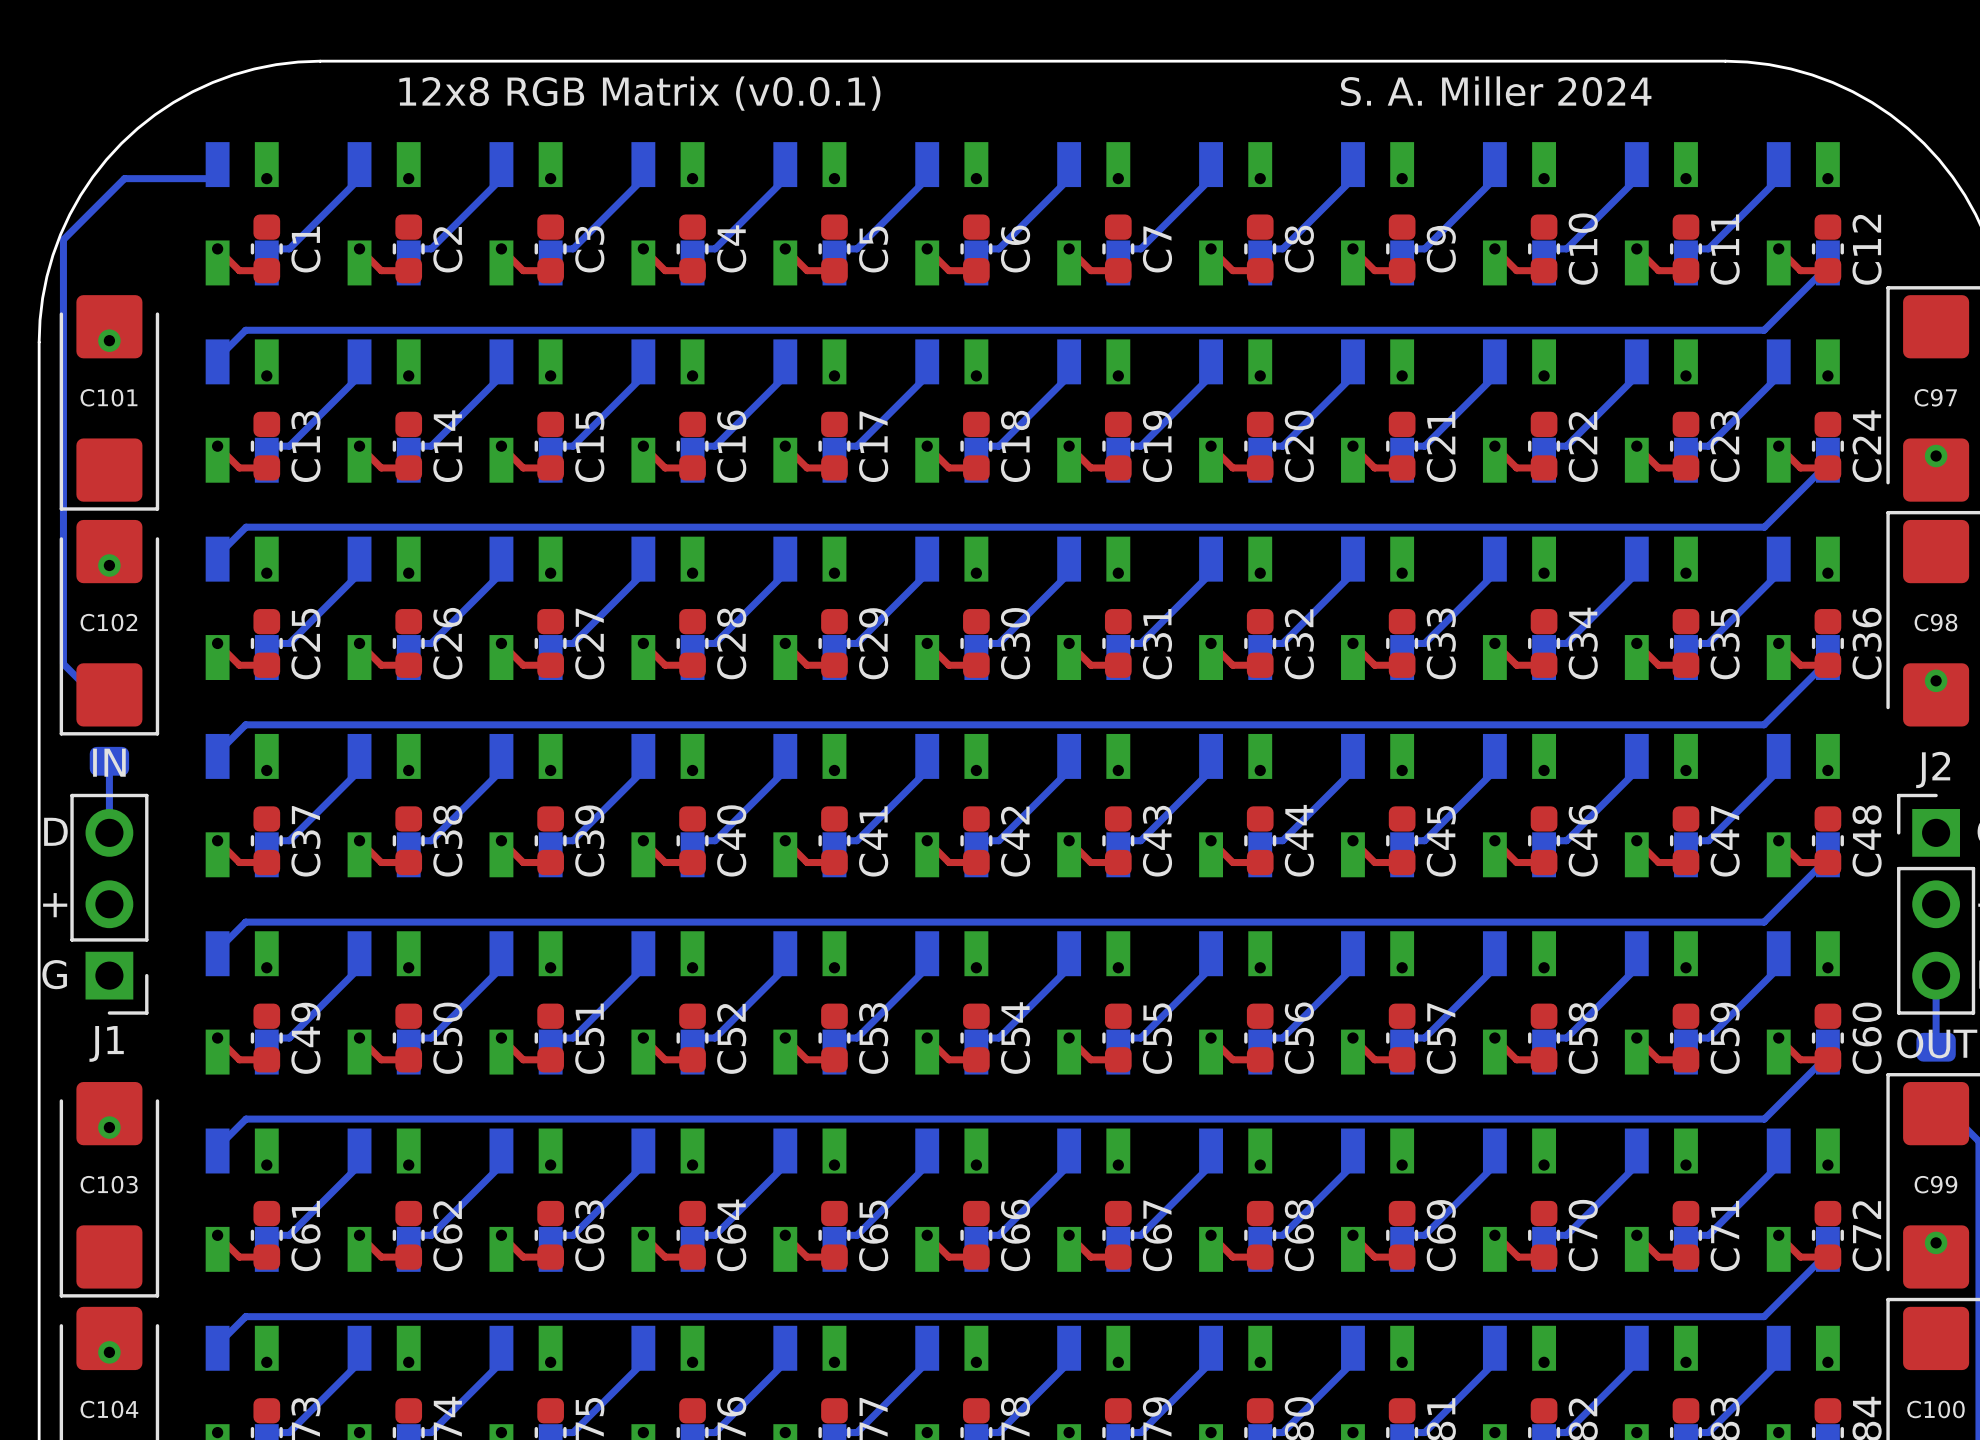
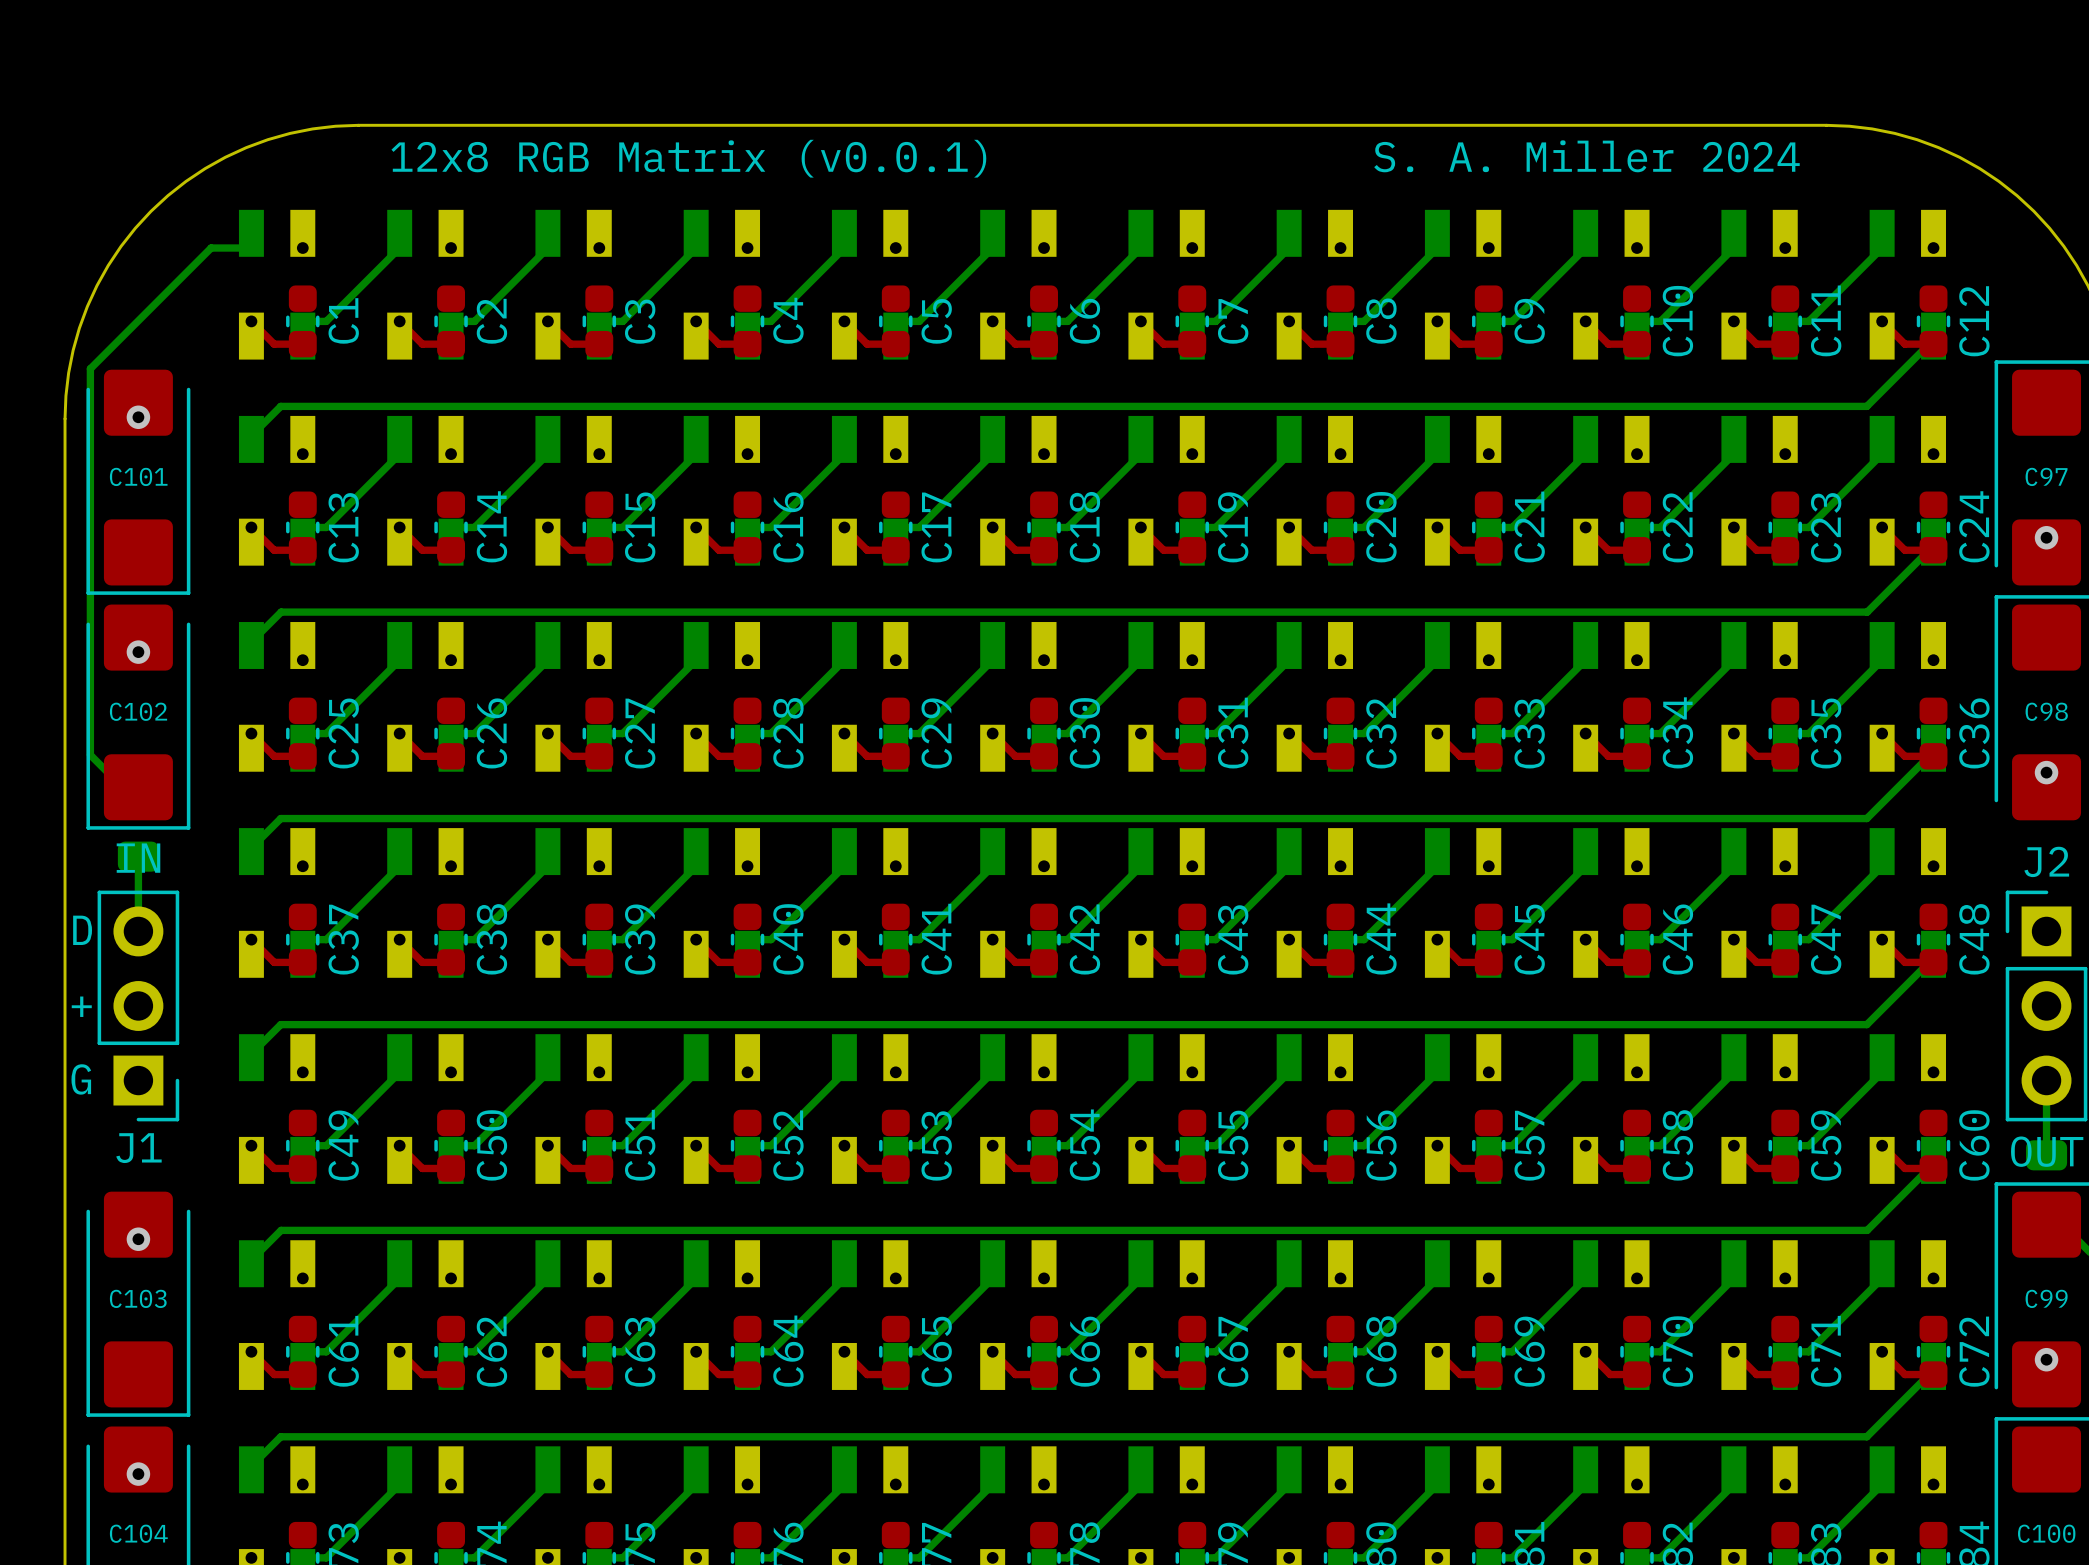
bottom track: (179, 178) (124, 178) (63, 239) (63, 294) -> (211, 248) (90, 368)

